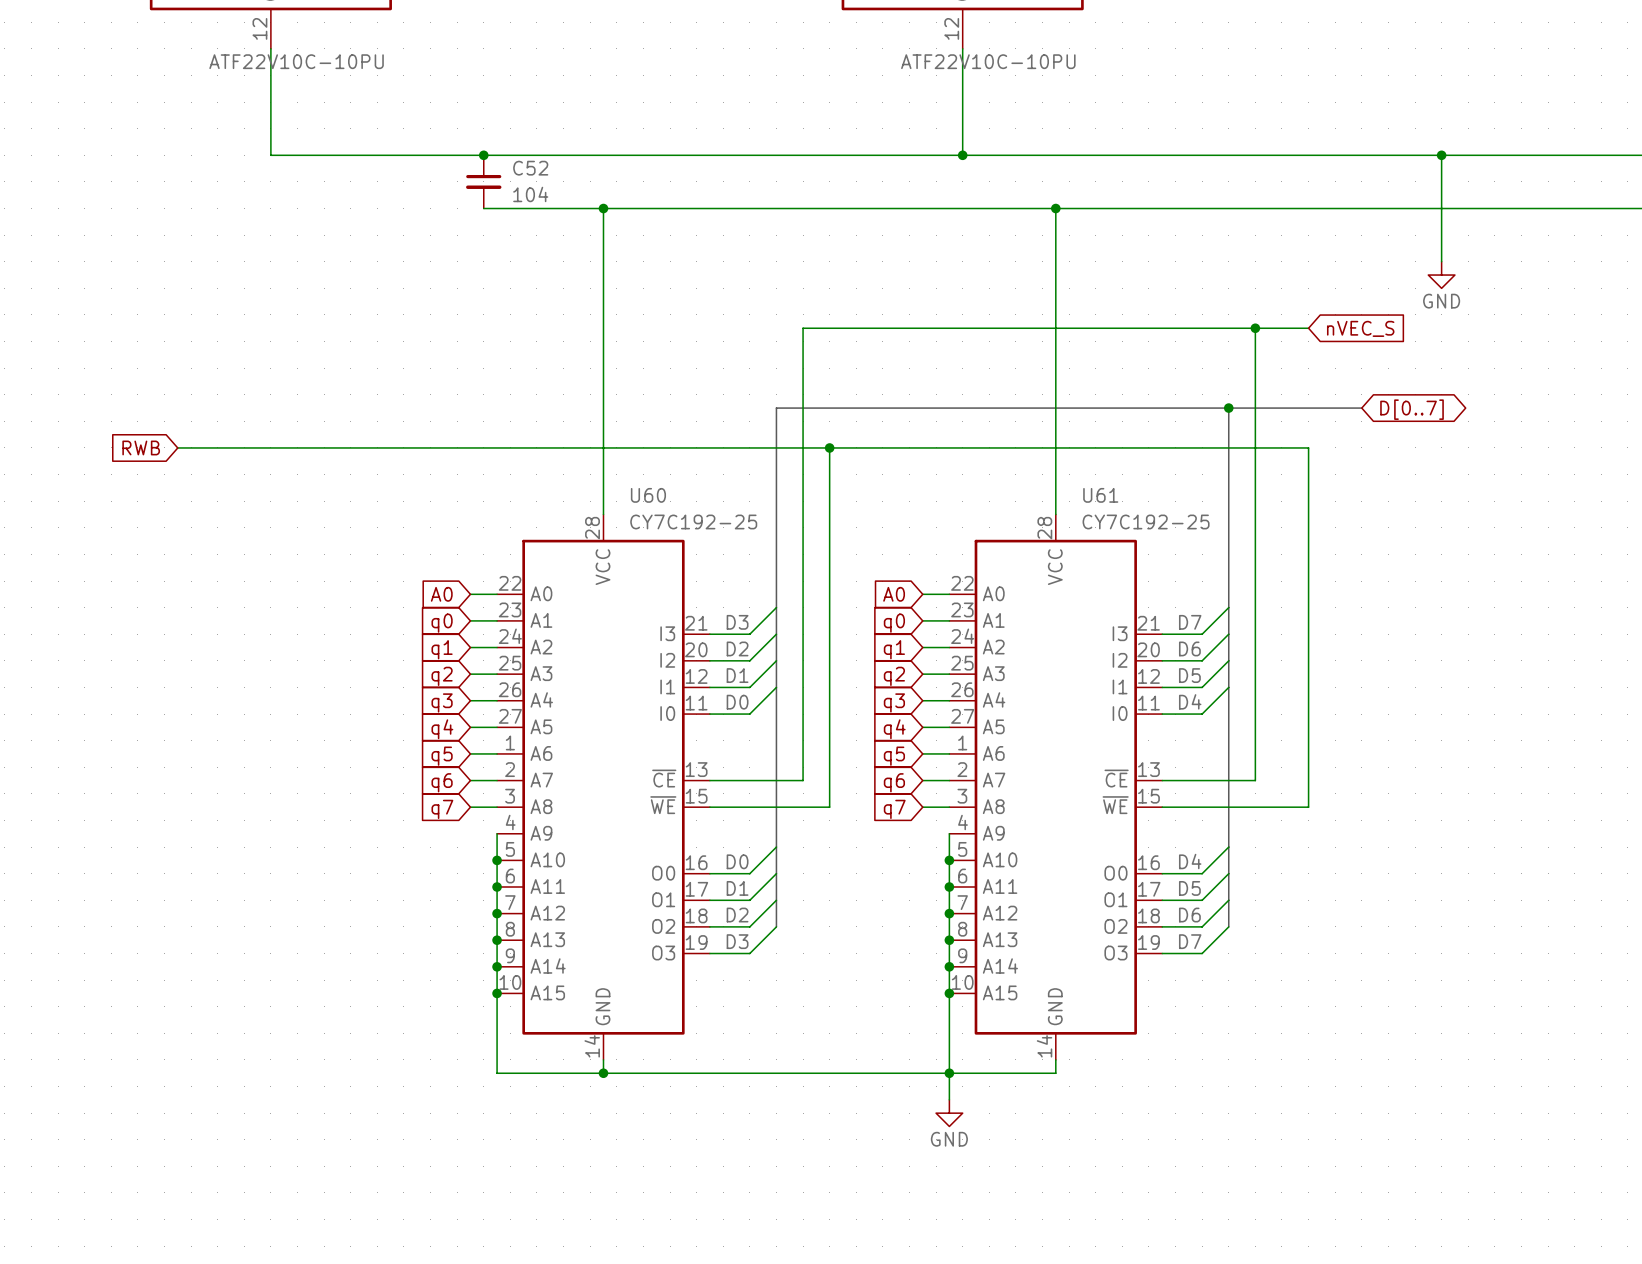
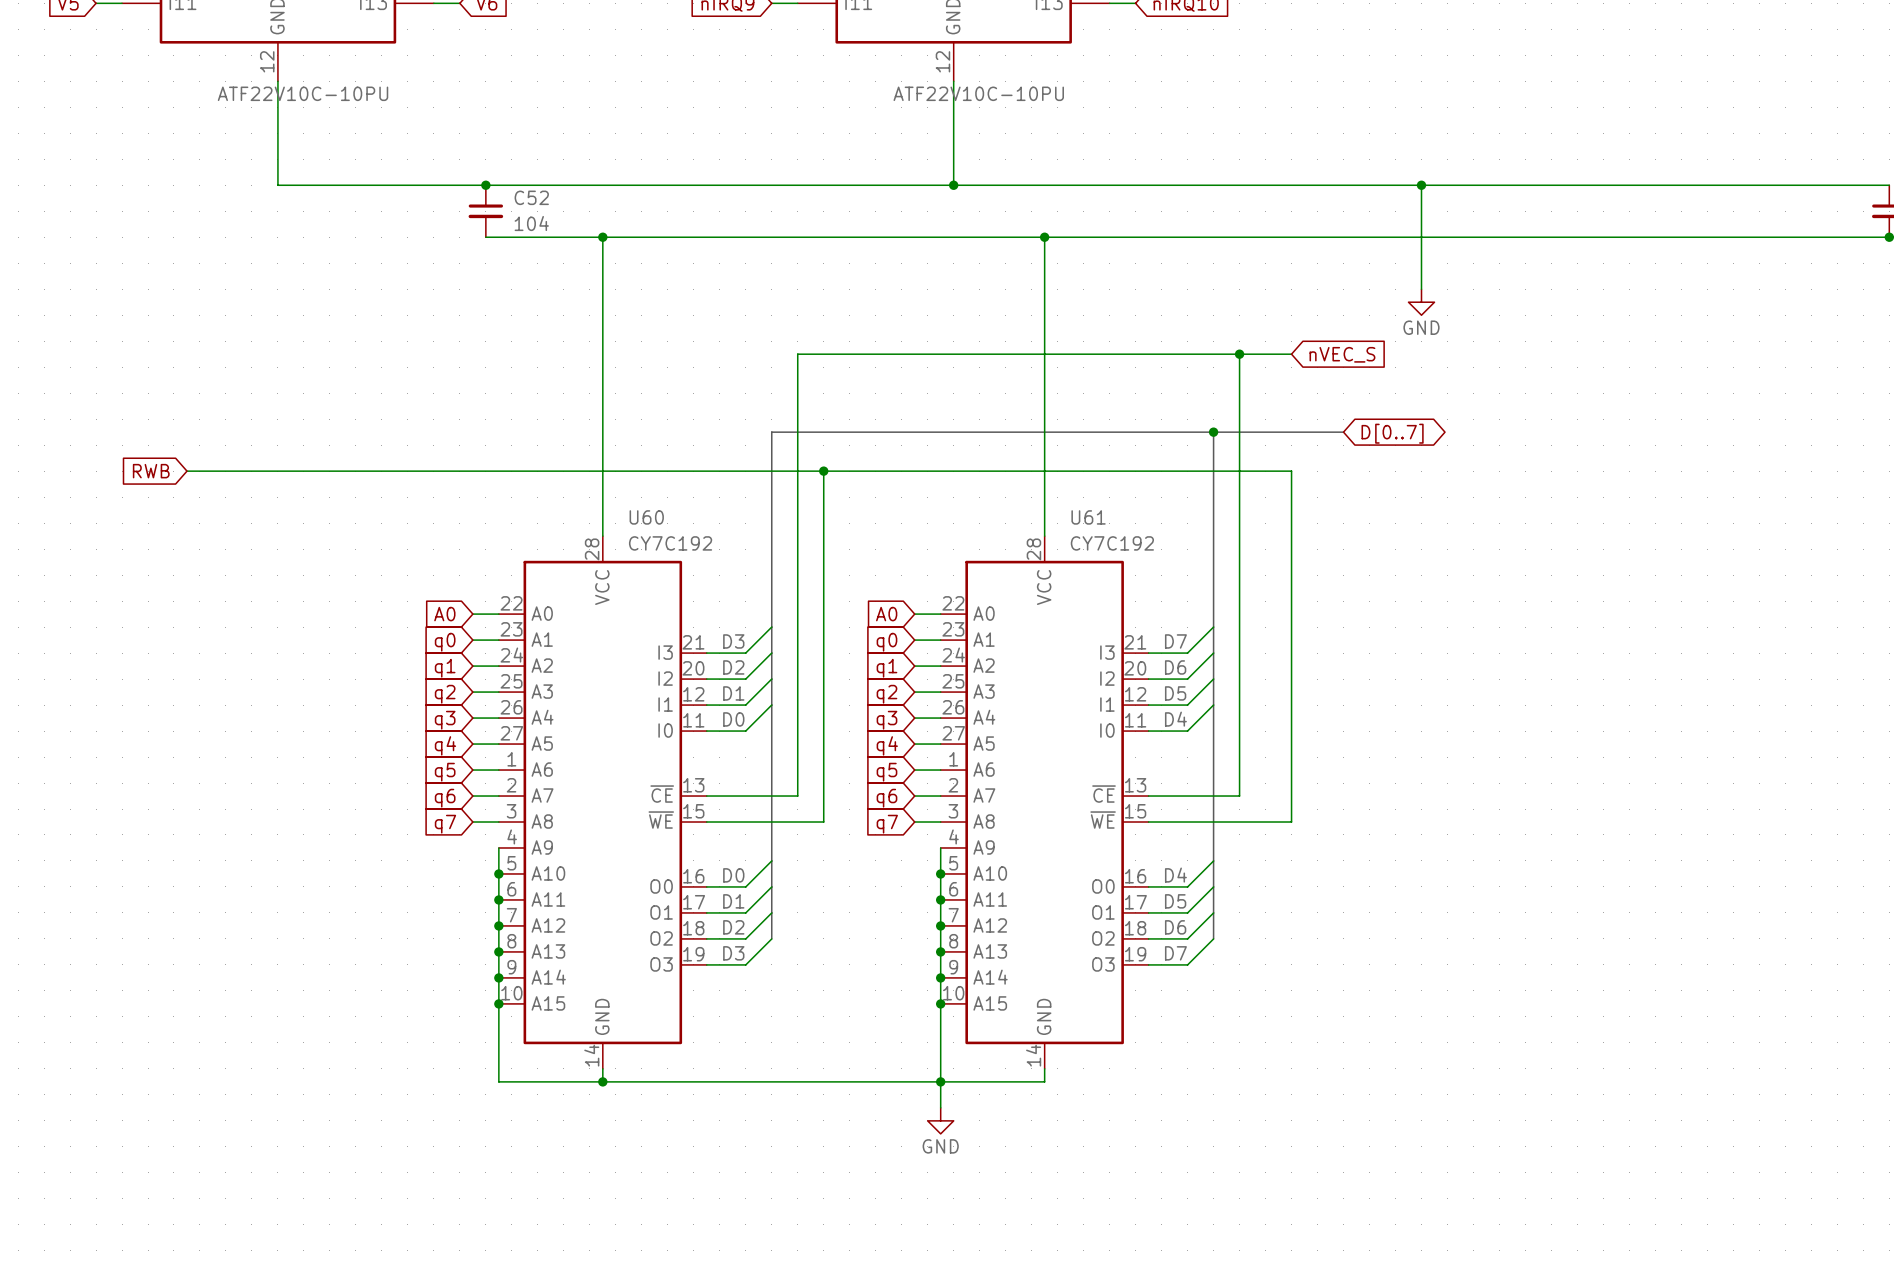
U60 value: CY7C192-25 (693, 521) -> CY7C192 (670, 543)
U61 value: CY7C192-25 (1146, 521) -> CY7C192 (1112, 543)

